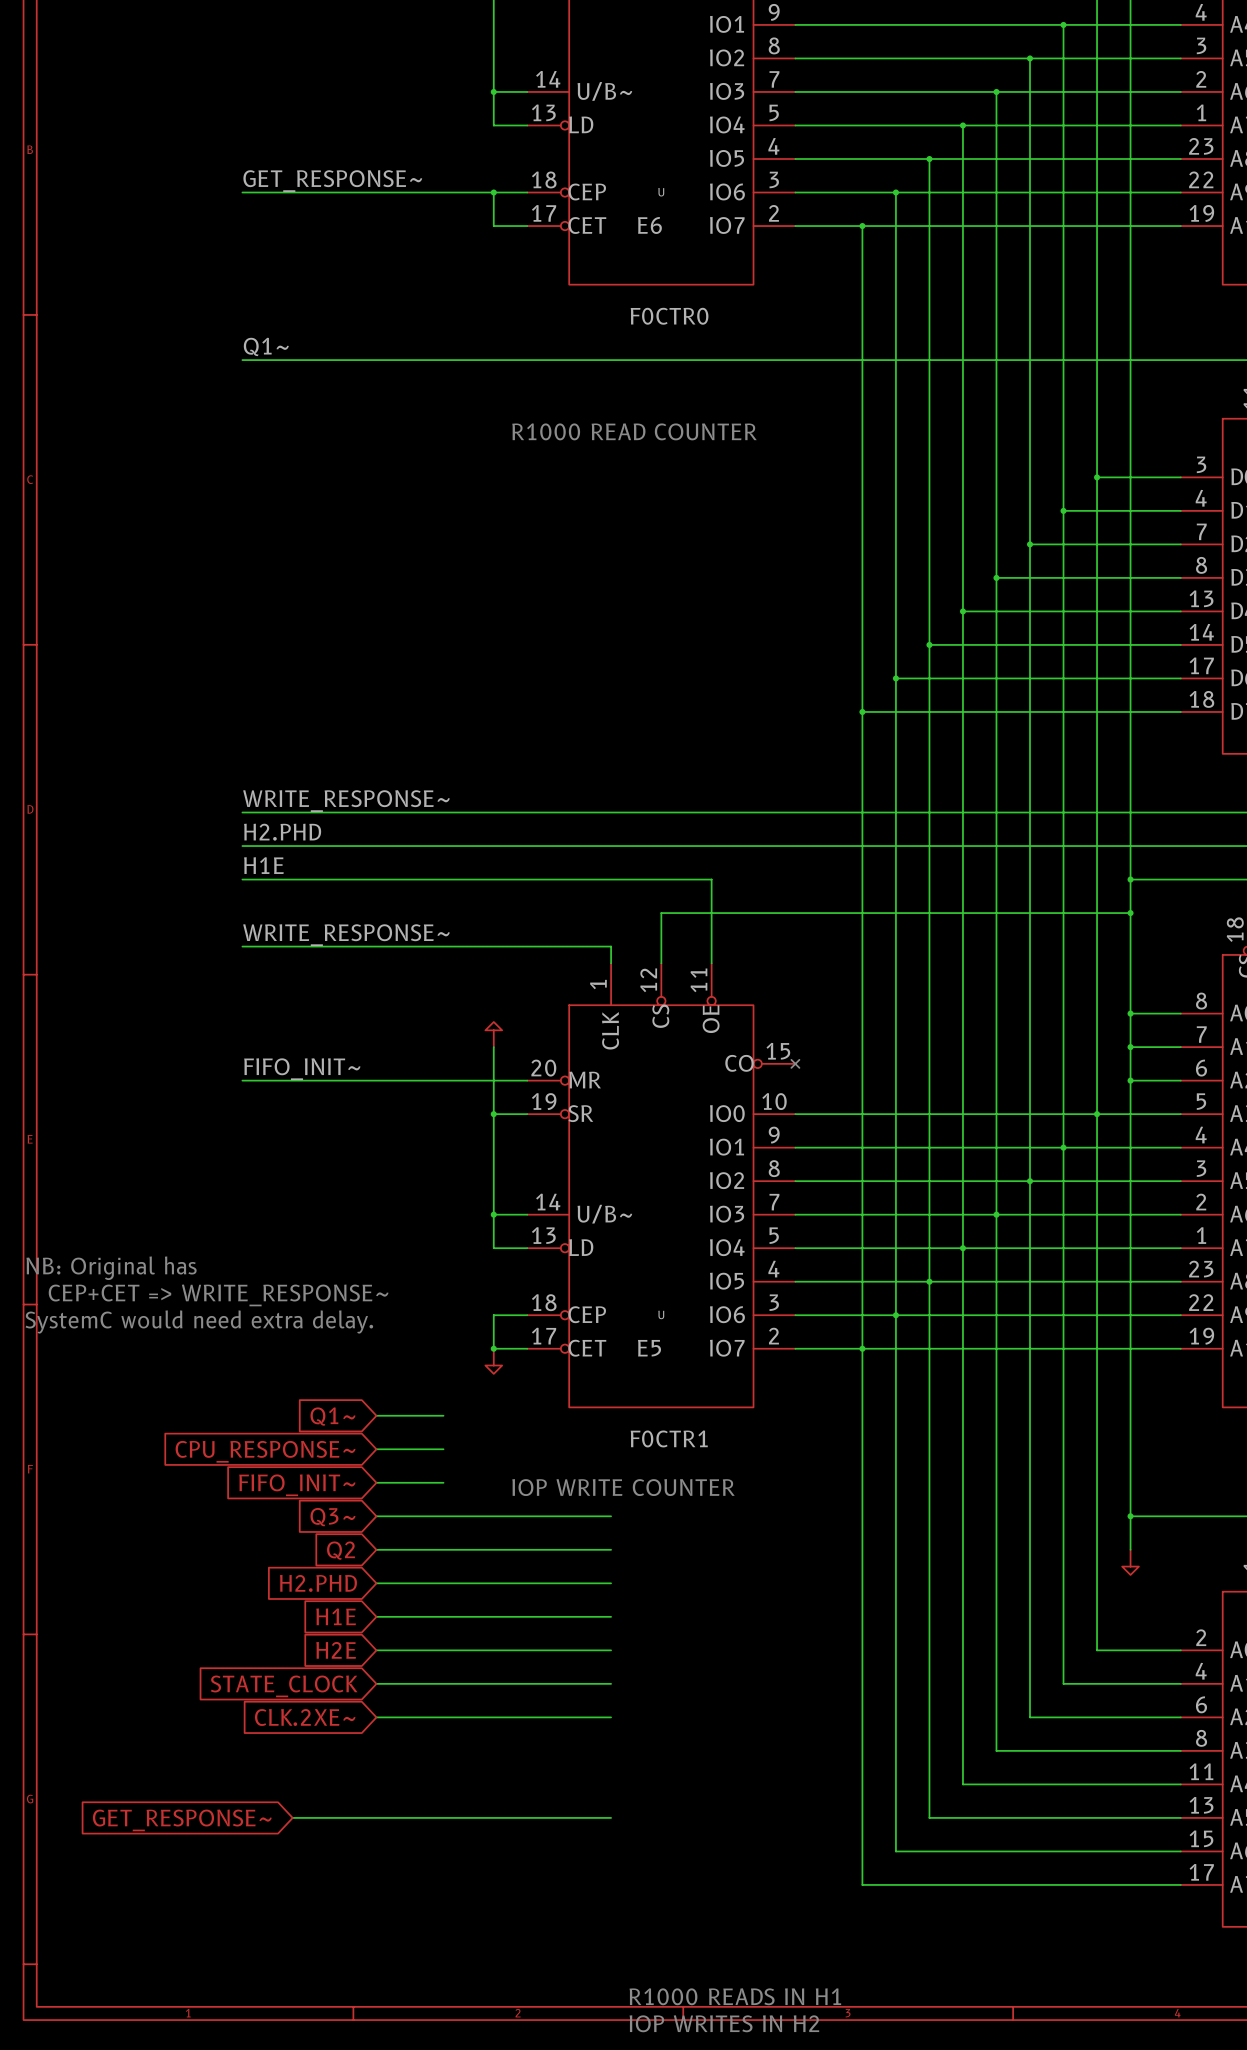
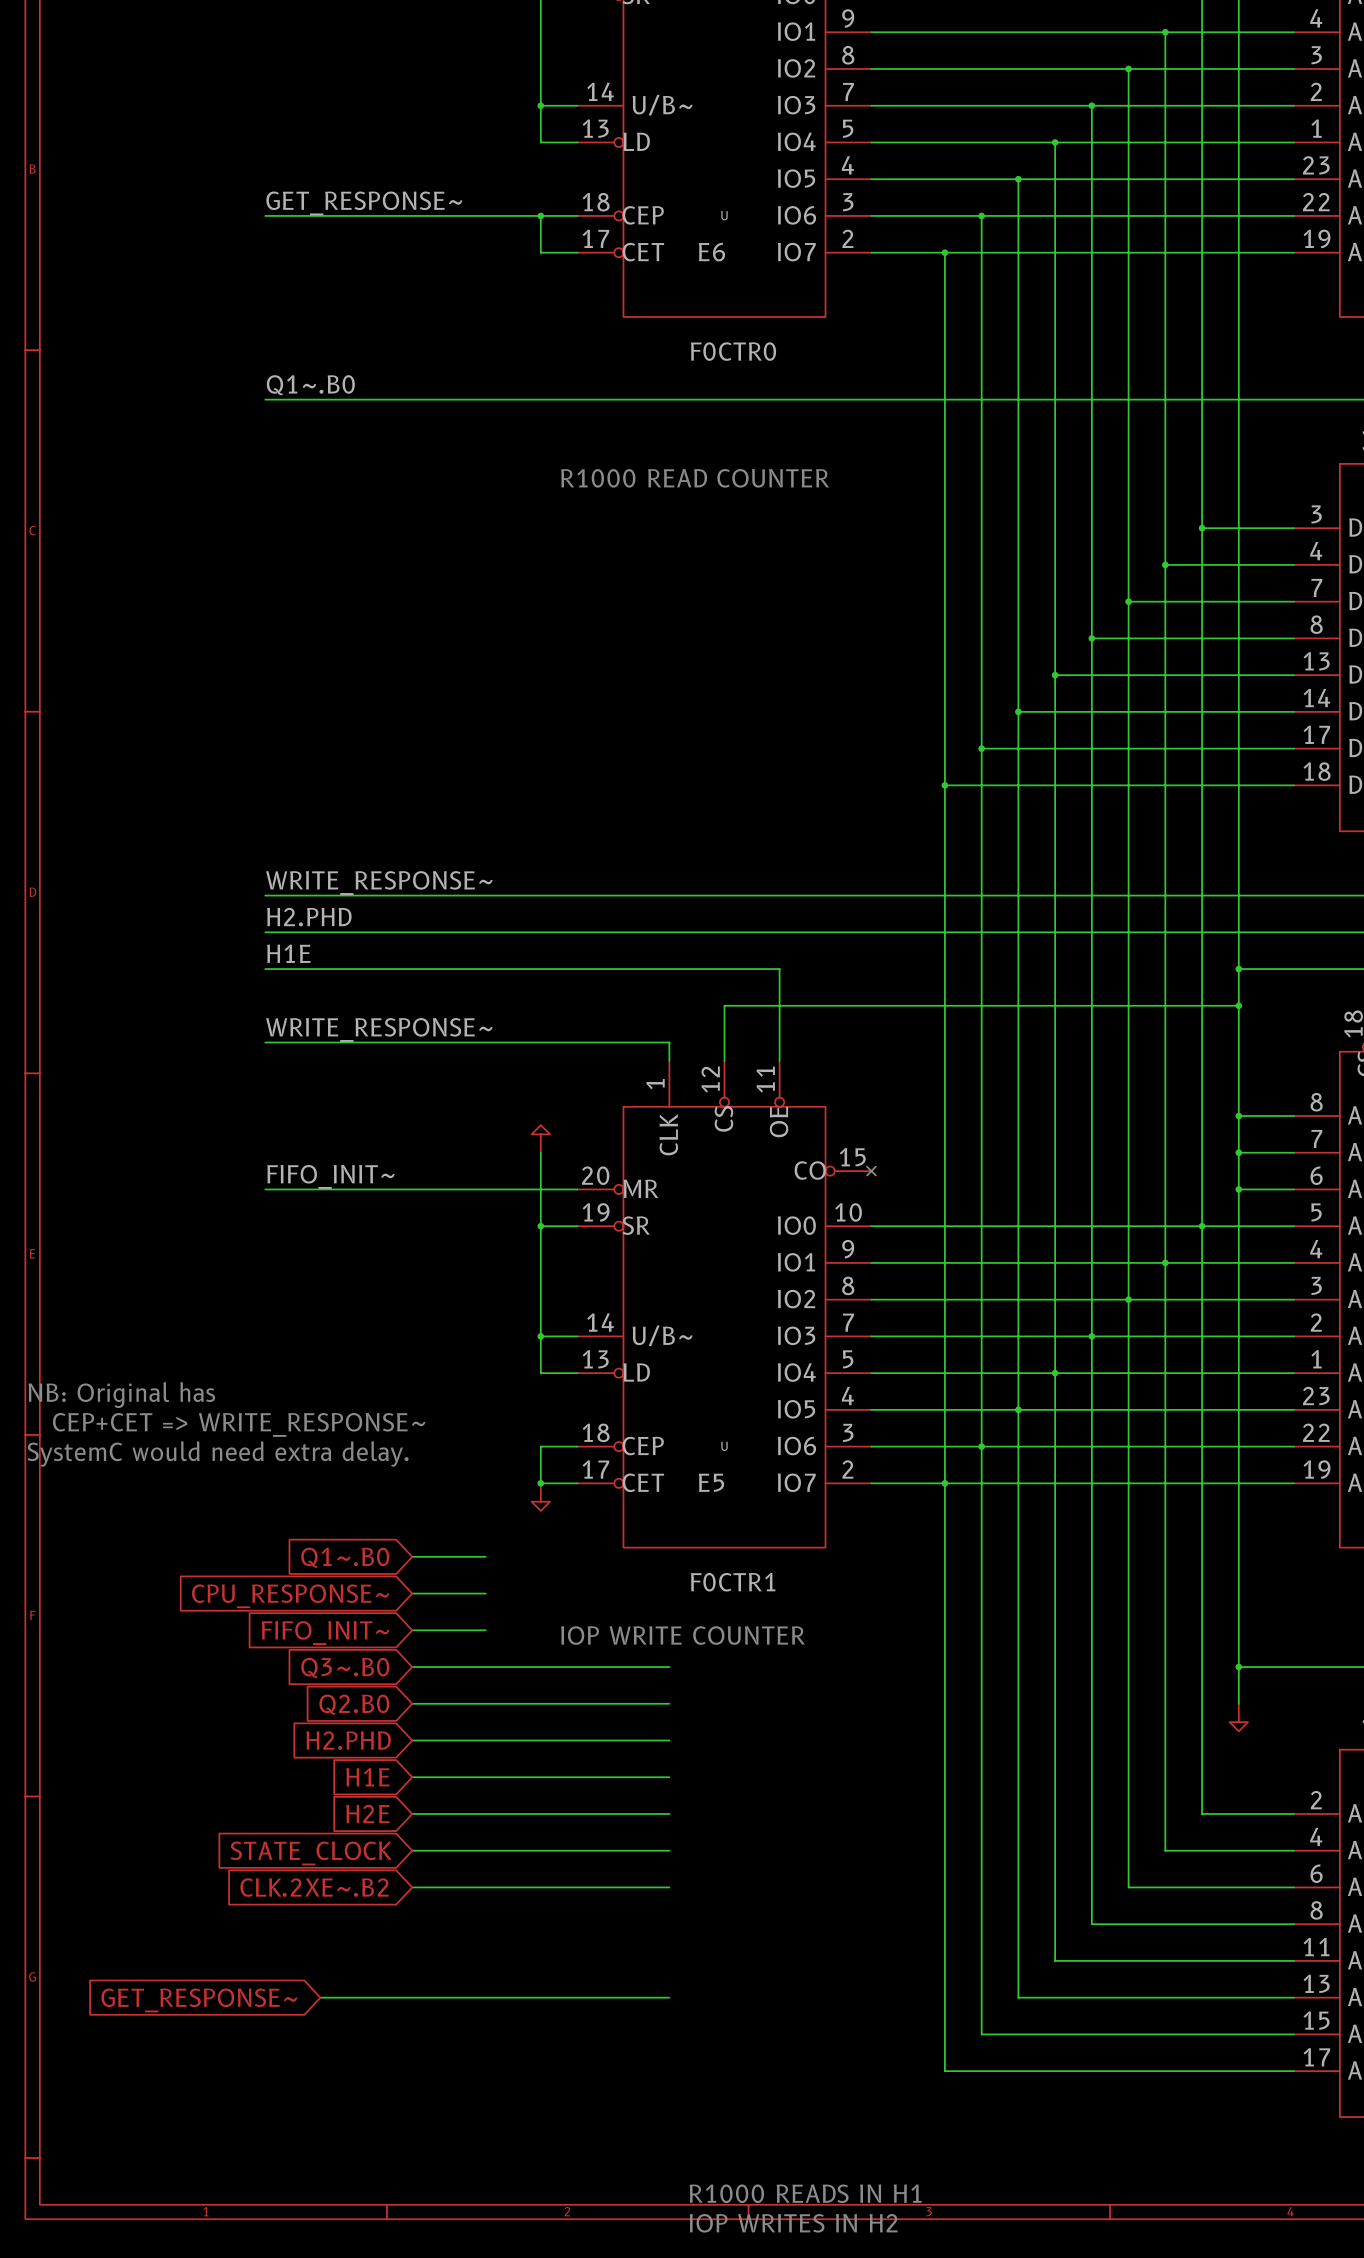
label: Q1~ (266, 346) -> Q1~.B0 (310, 385)
global label: Q1~ (332, 1416) -> Q1~.B0 (345, 1557)
global label: Q3~ (332, 1517) -> Q3~.B0 (345, 1667)
global label: Q2 (340, 1550) -> Q2.B0 (354, 1704)
global label: CLK.2XE~ (305, 1717) -> CLK.2XE~.B2 (314, 1887)

